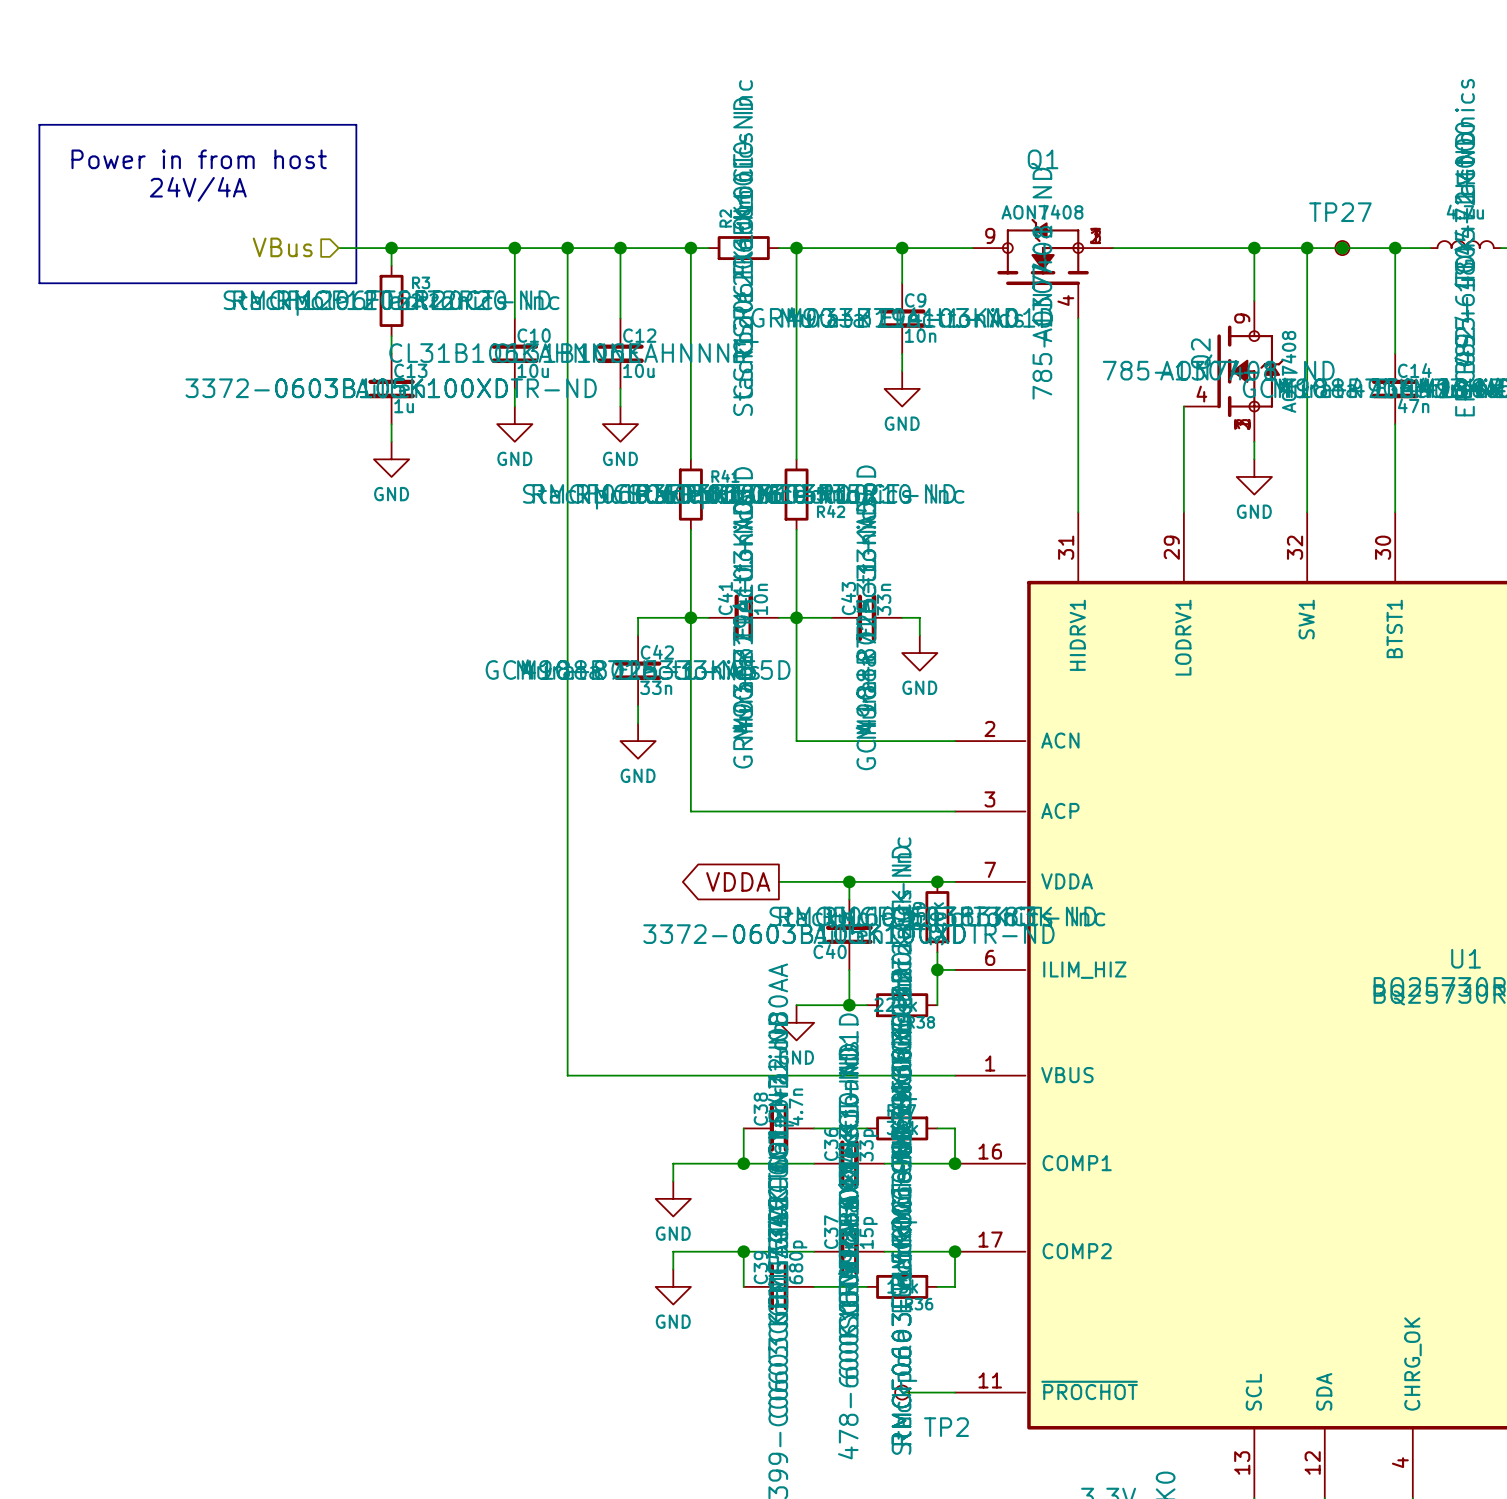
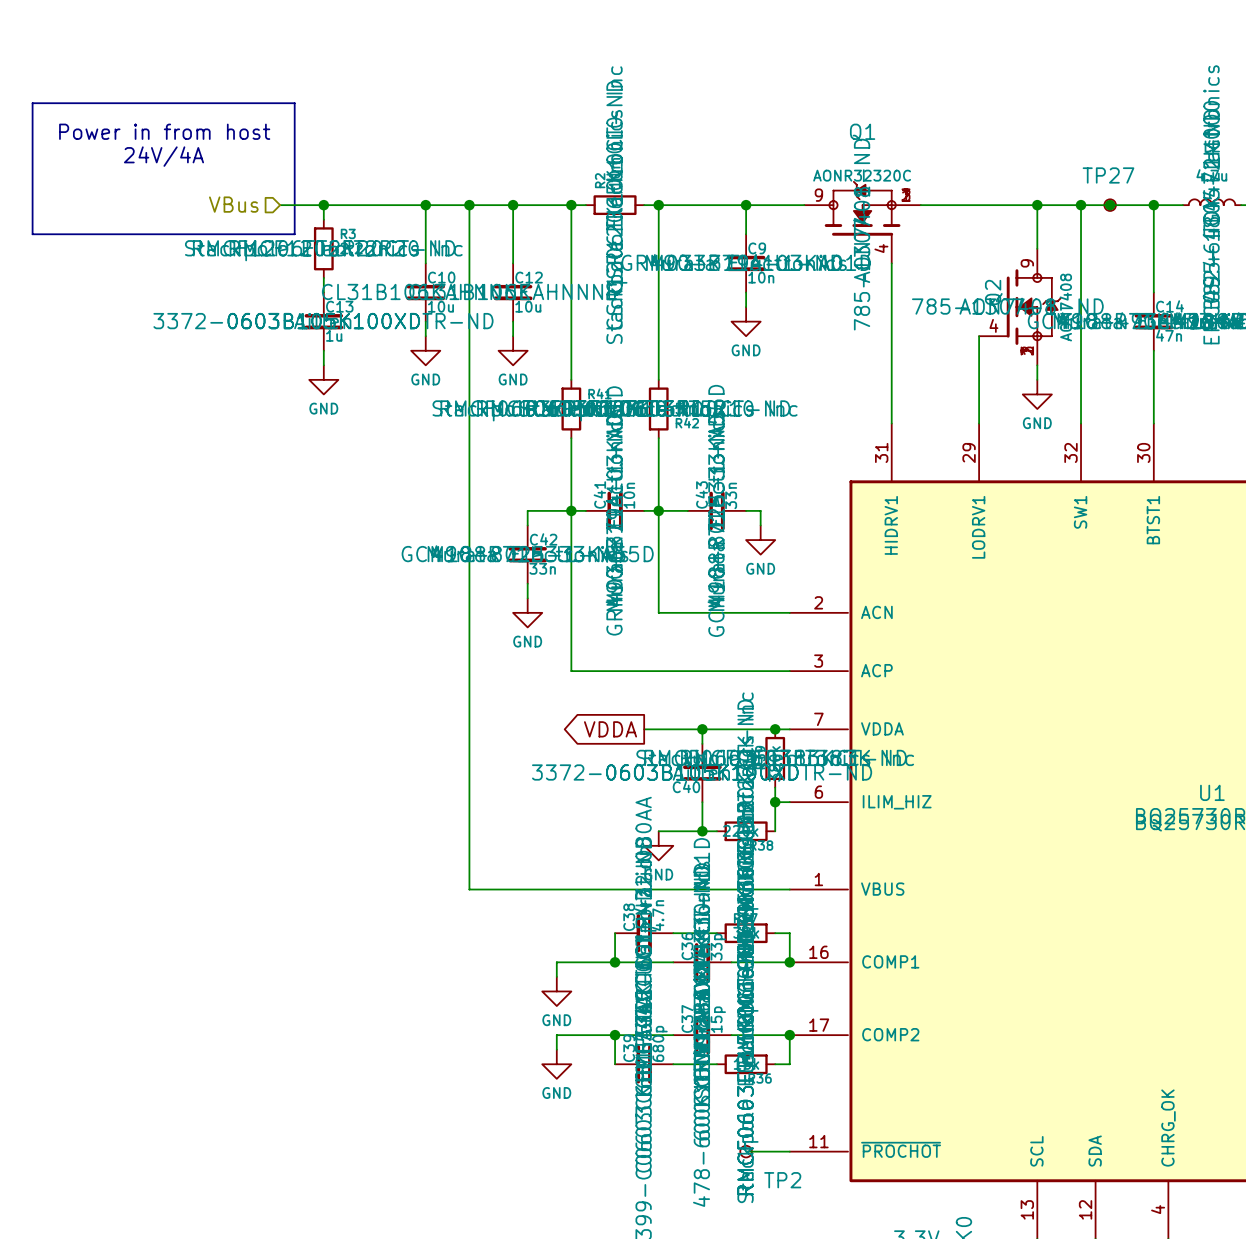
Q1 value: AON7408 (1042, 212) -> AONR32320C (862, 175)

